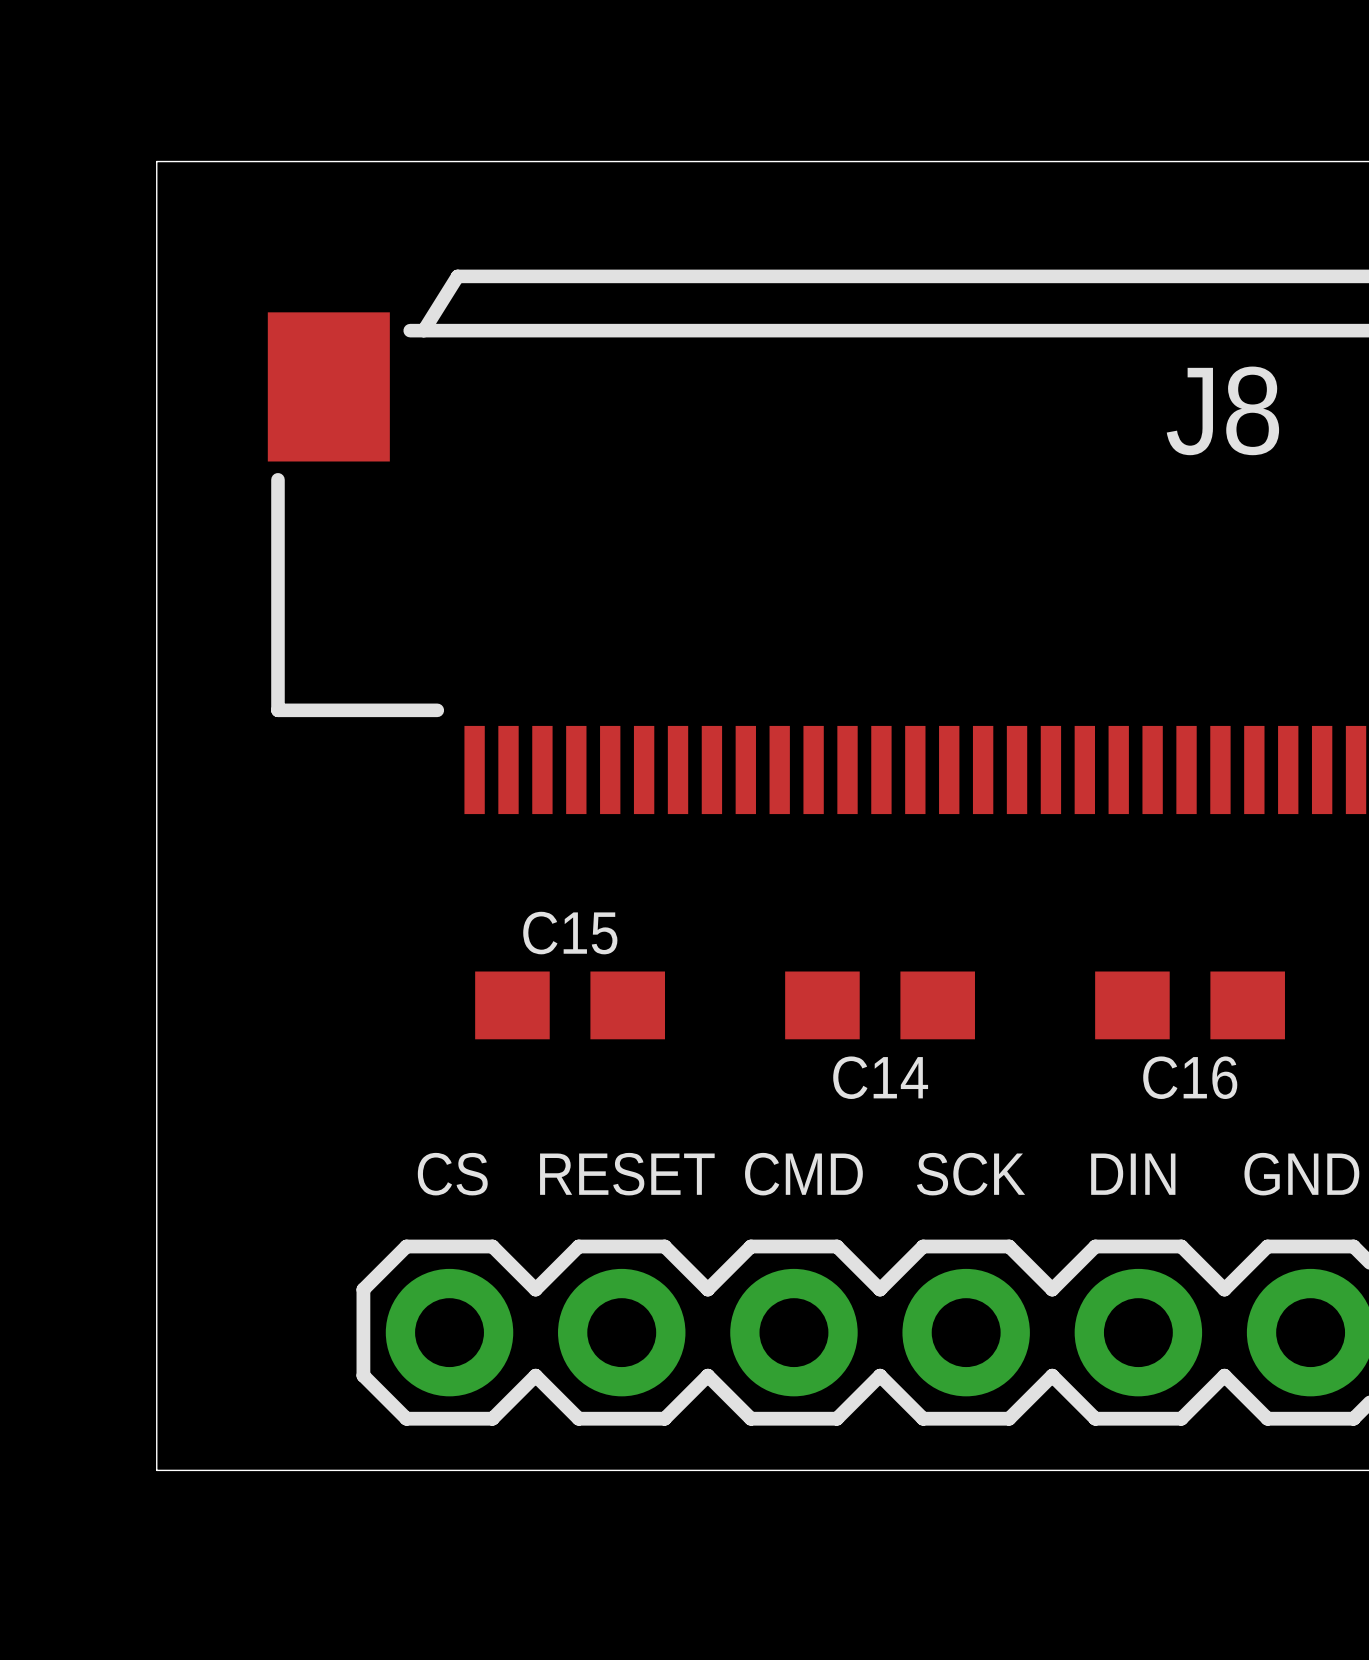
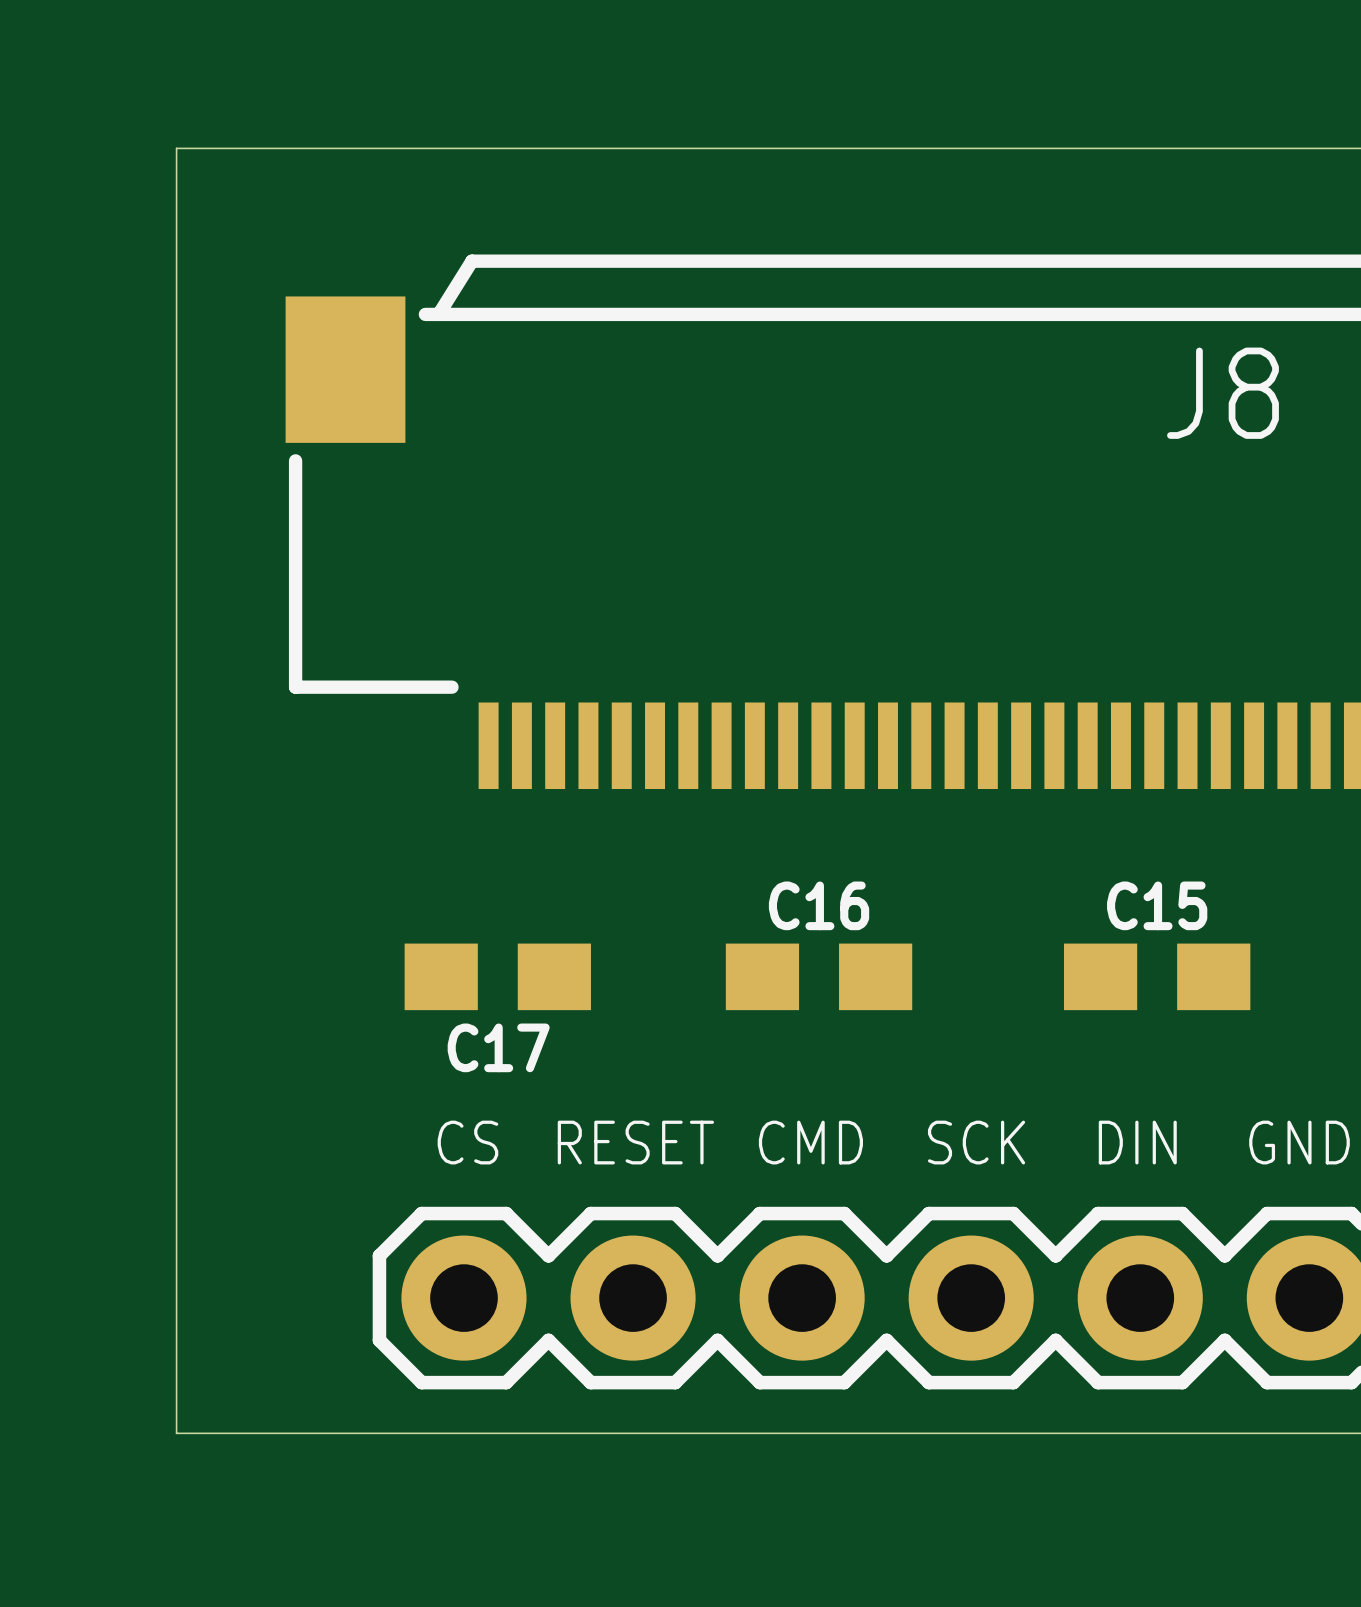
C17: none -> (497, 976)
C15 position: (570, 1005) -> (1157, 976)
C14: (880, 1005) -> none
C16 position: (1190, 1005) -> (819, 976)
C16 name position: C16 (1190, 1077) -> C16 (819, 905)

